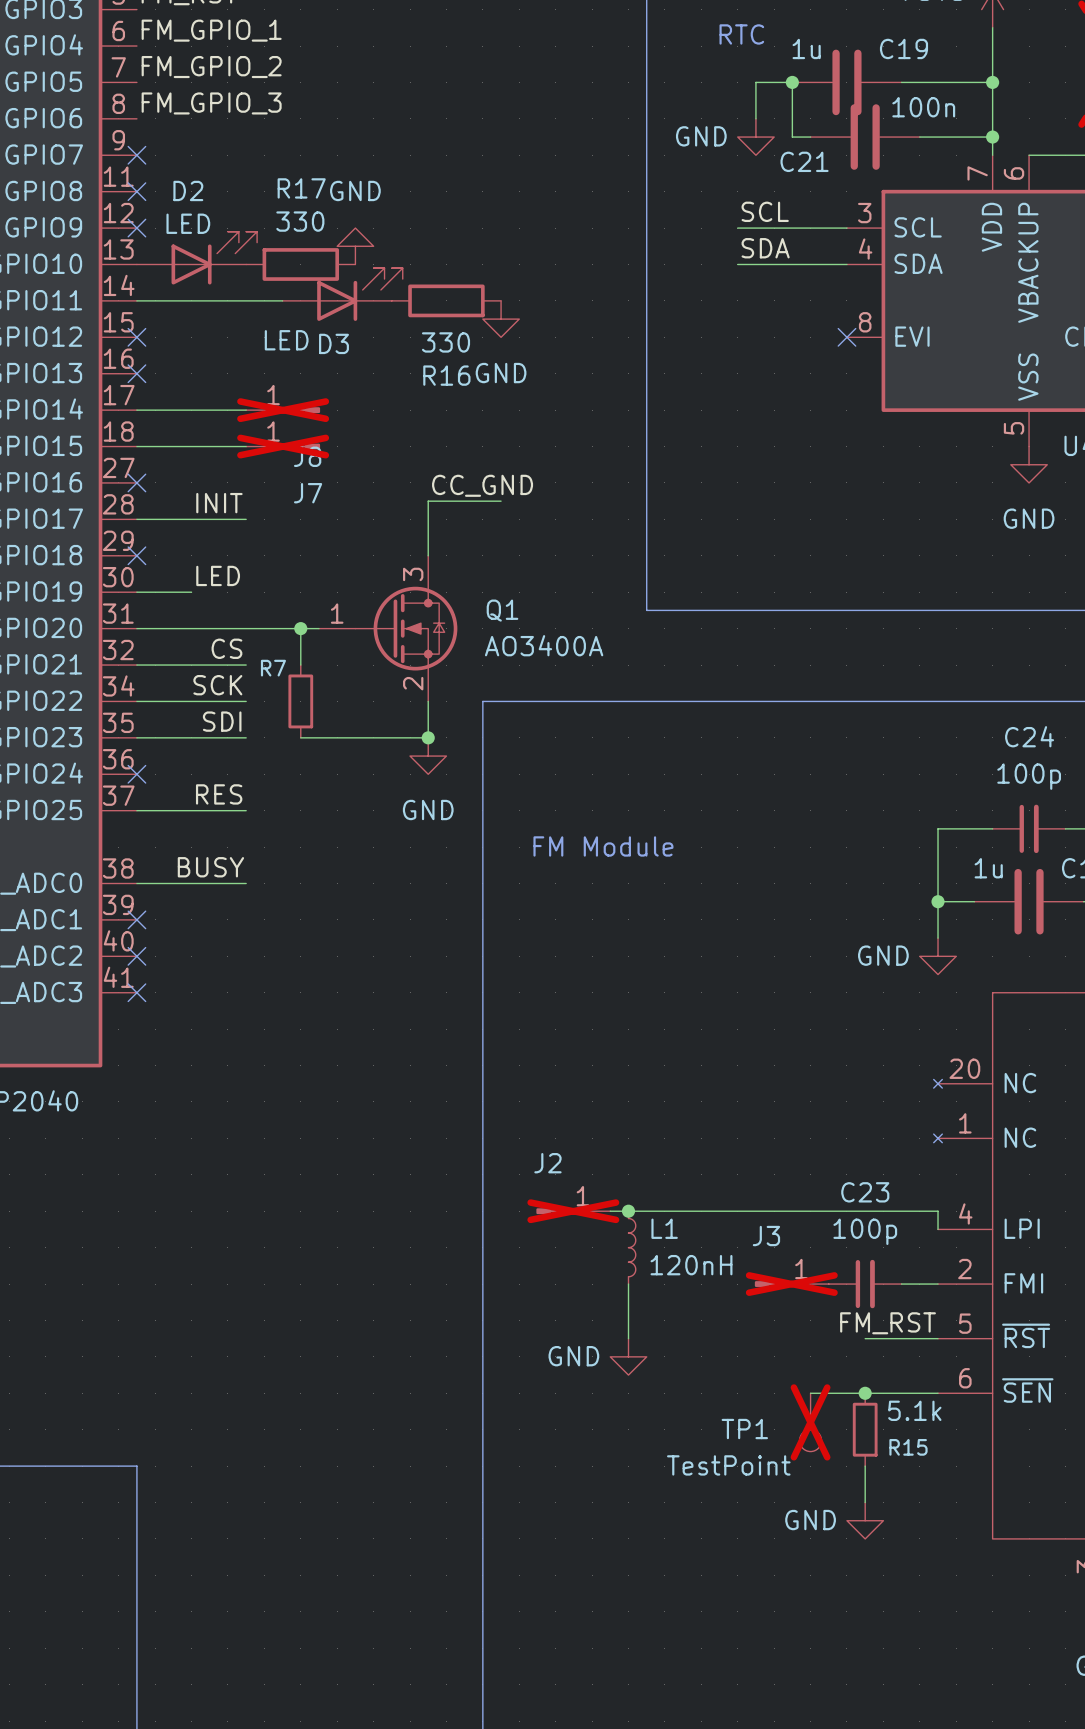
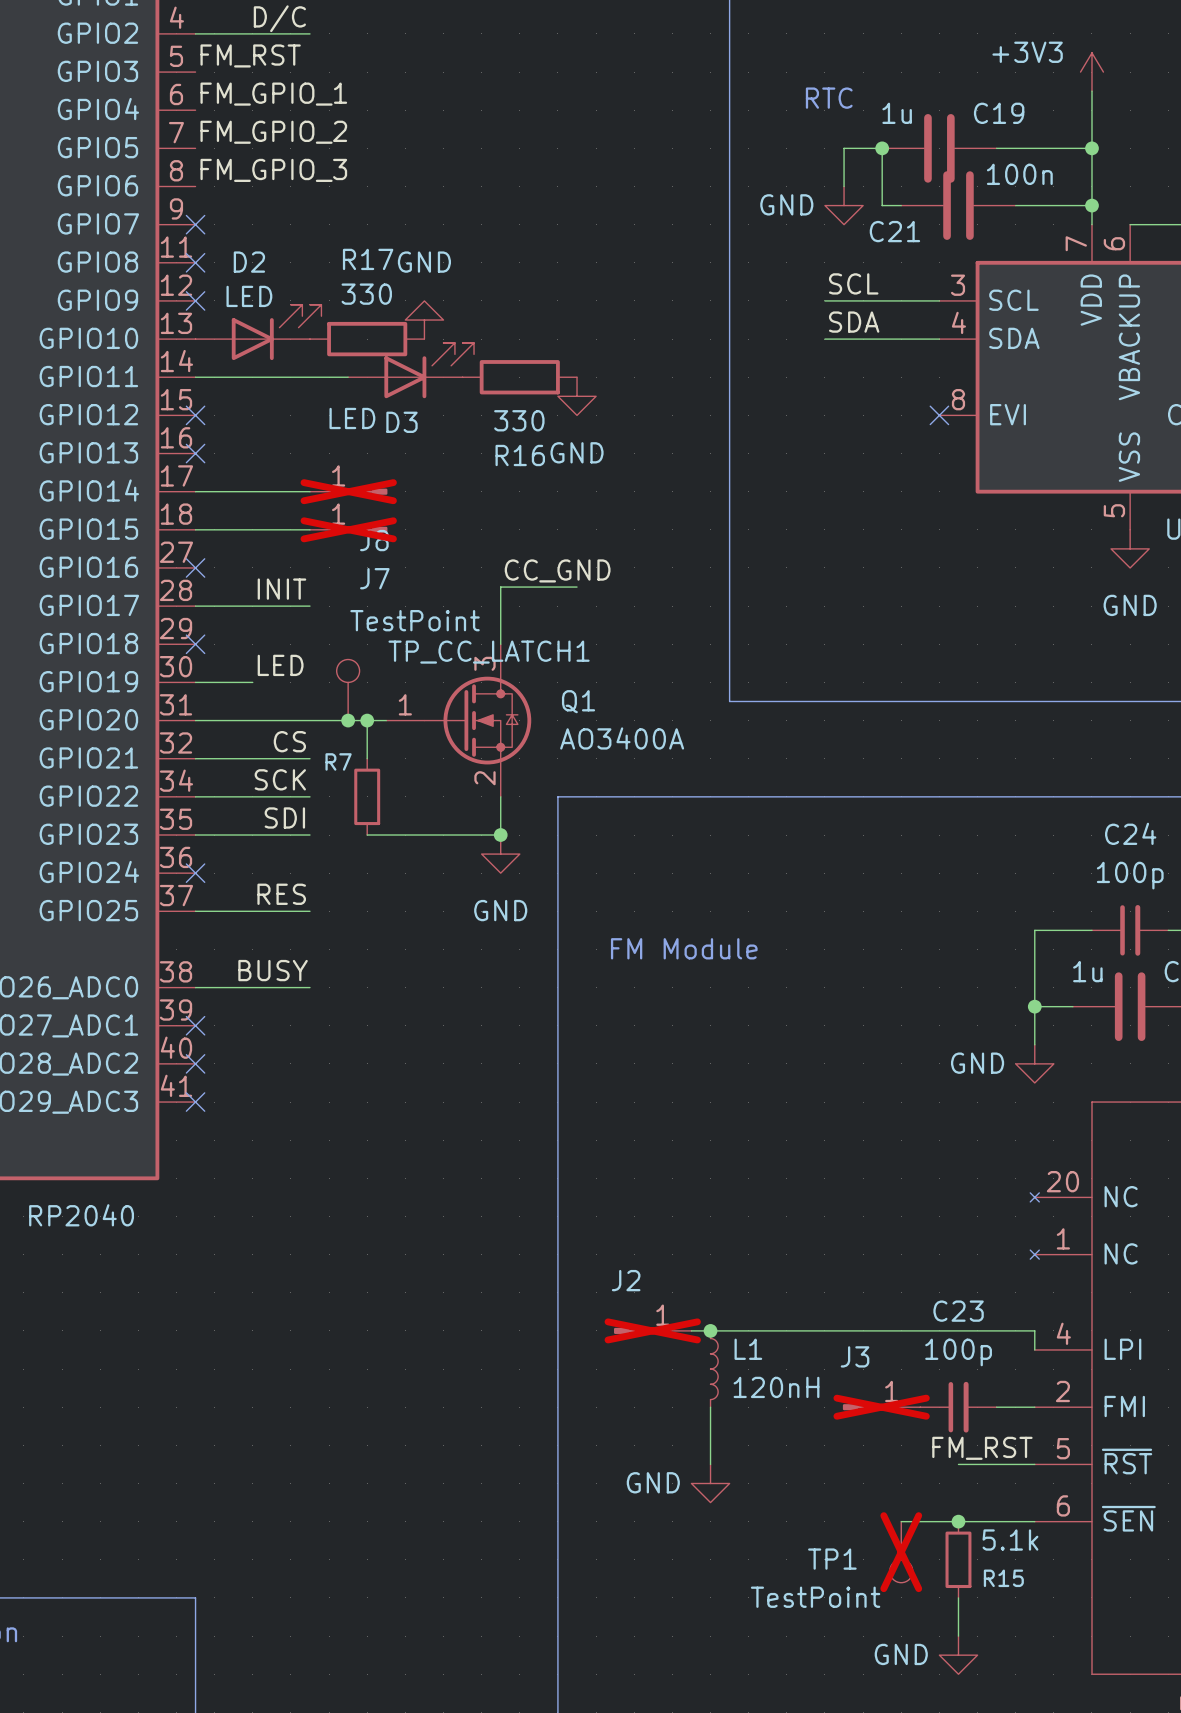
TP_CC_LATCH1: none -> TestPoint (348, 690)
junction: none -> (348, 720)

